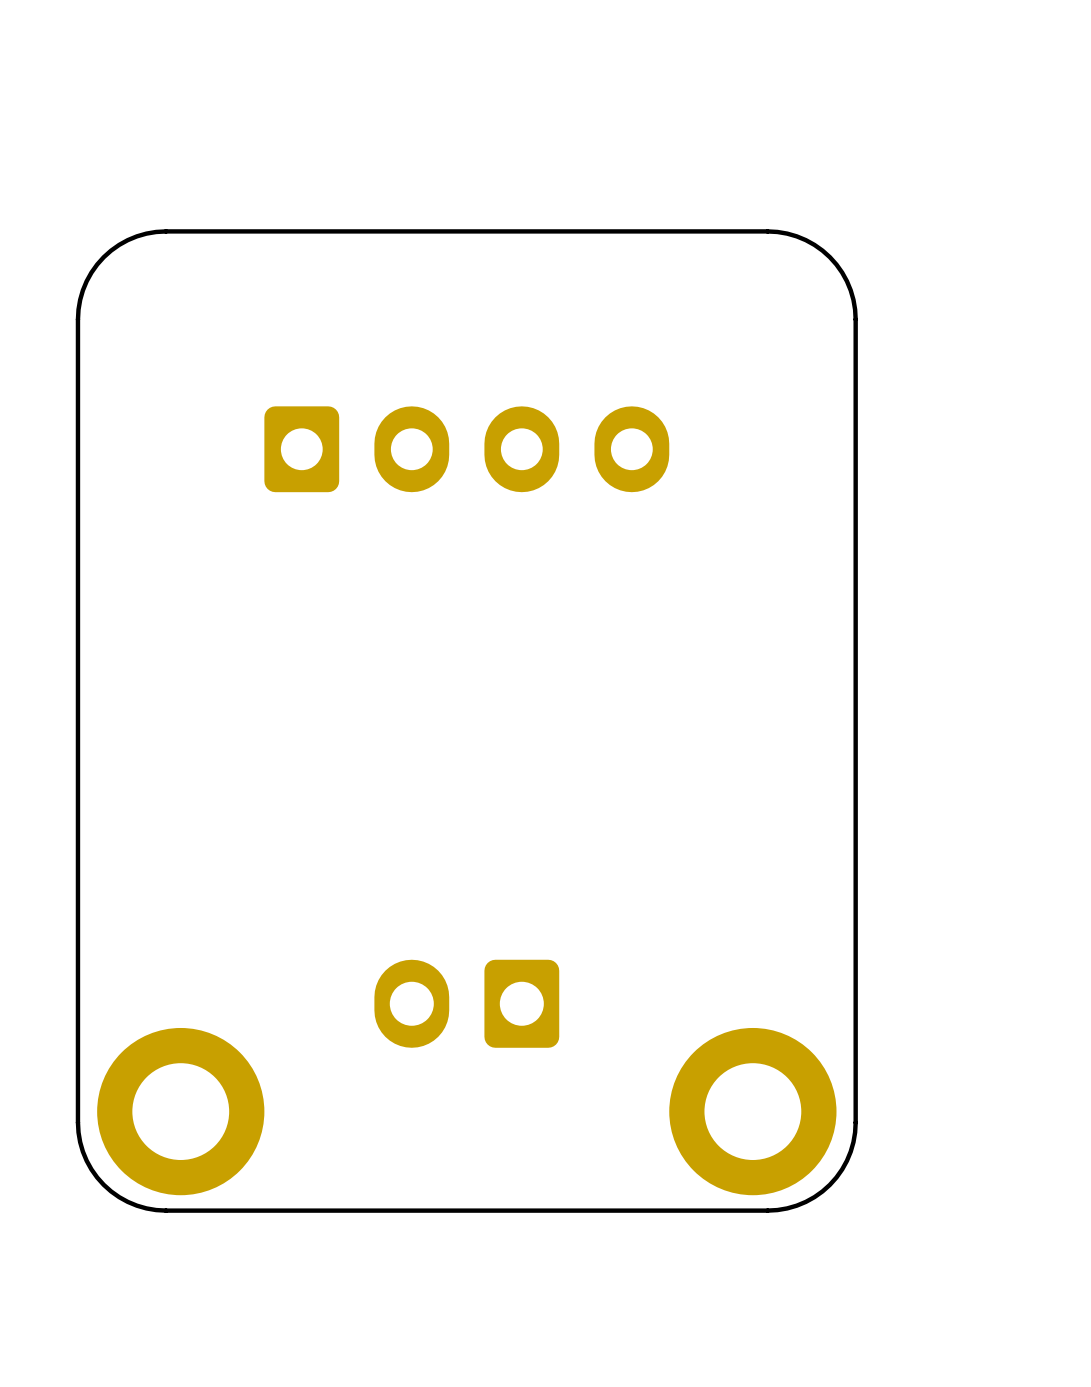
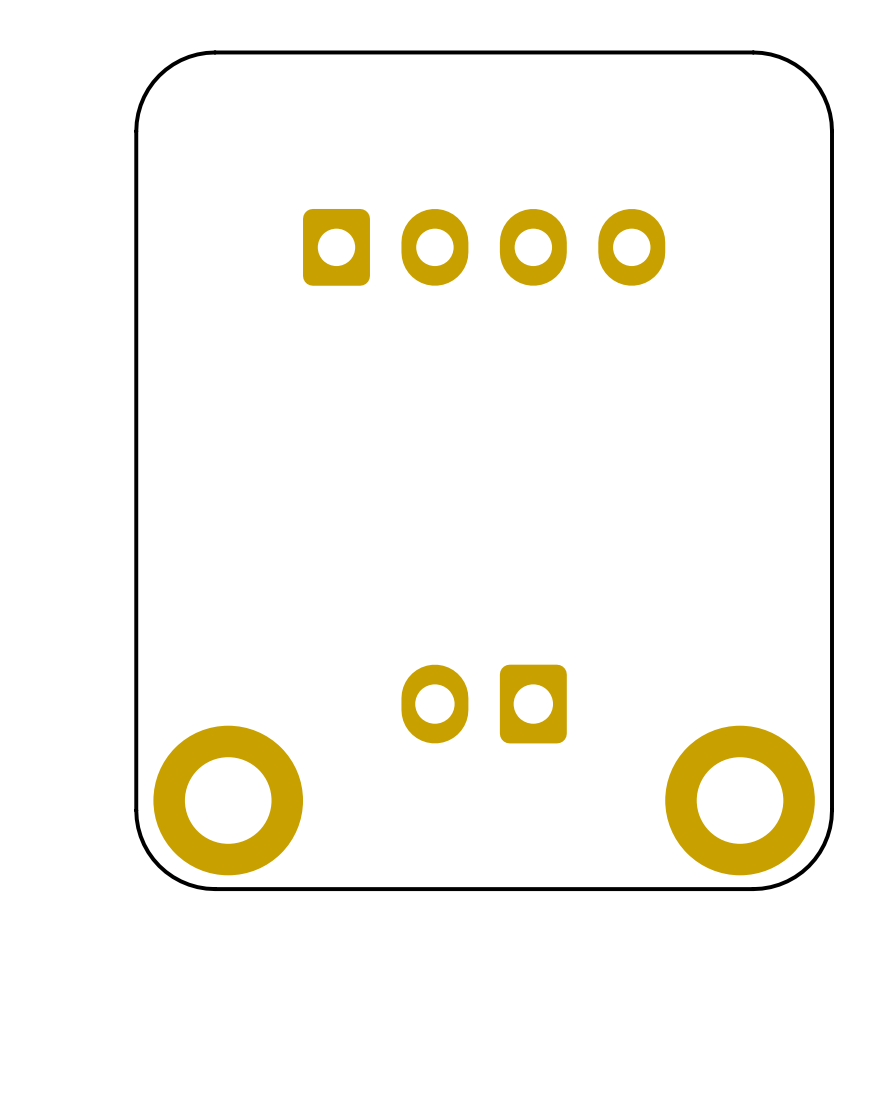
board edge: (855, 363) (855, 309) (850, 290) (842, 272) (829, 257) (805, 240) (787, 233) (767, 231) (165, 231) (146, 233) (127, 240) (111, 250) (97, 264) (86, 281) (78, 309) (77, 363) -> (832, 131) (827, 105) (819, 89) (808, 75) (795, 64) (779, 56) (753, 52) (206, 52) (180, 60) (159, 75) (144, 97) (138, 113) (136, 131)
part position: (466, 449) -> (484, 247)

